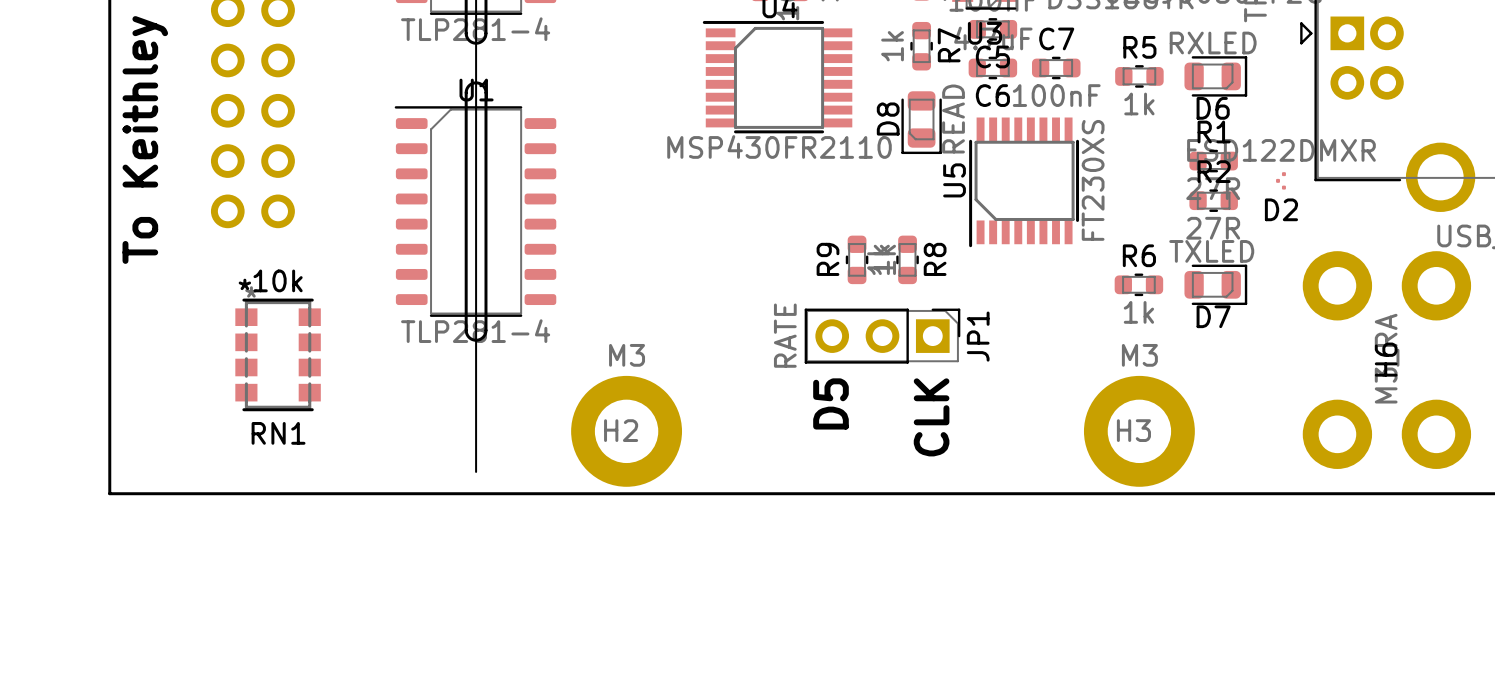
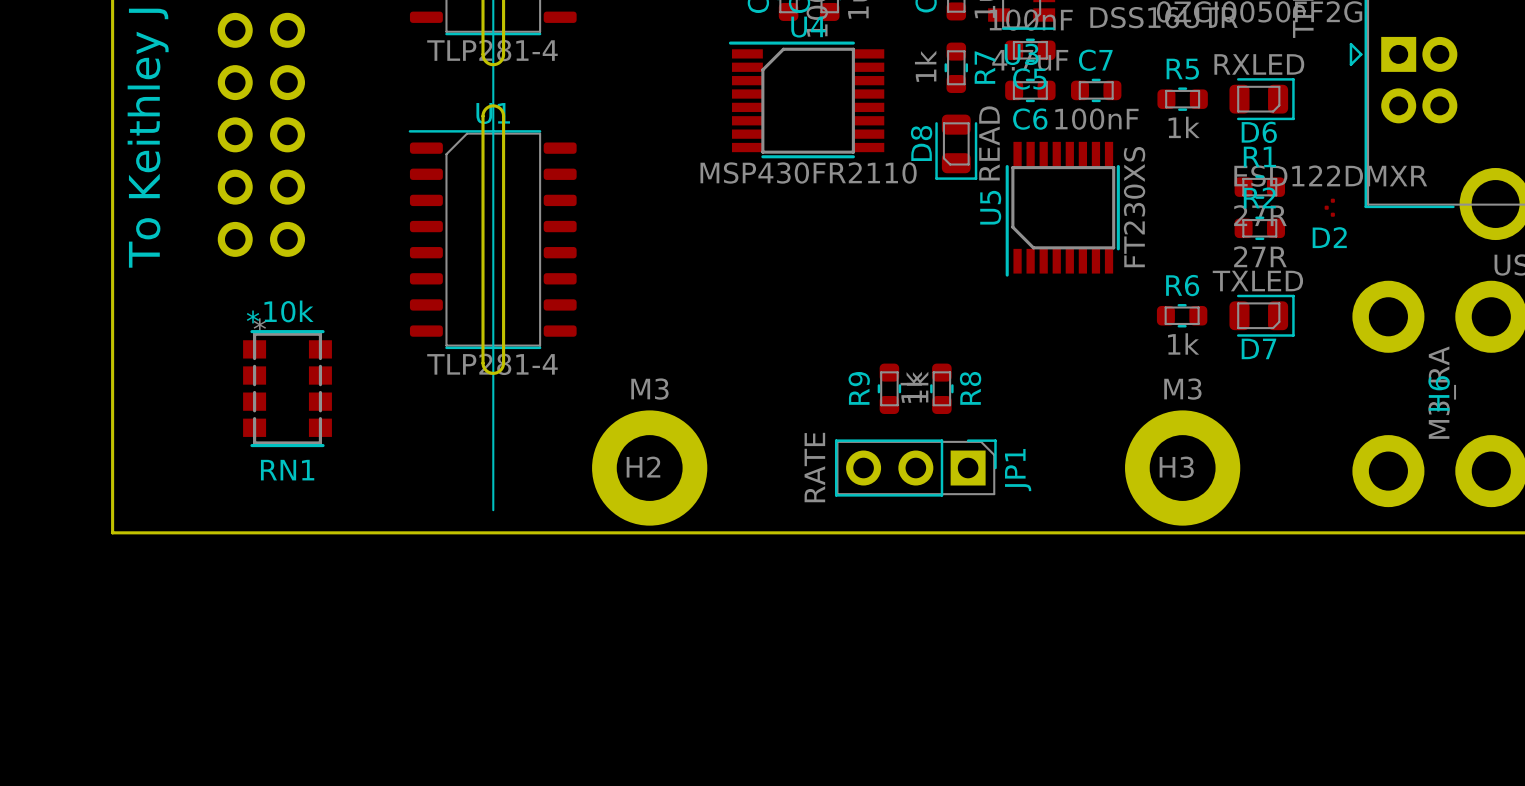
R9 position: (857, 259) -> (889, 388)
R8 position: (907, 259) -> (941, 388)
JP1 position: (882, 336) -> (915, 468)
text: D5 (830, 403) -> none
text: CLK (931, 417) -> none

